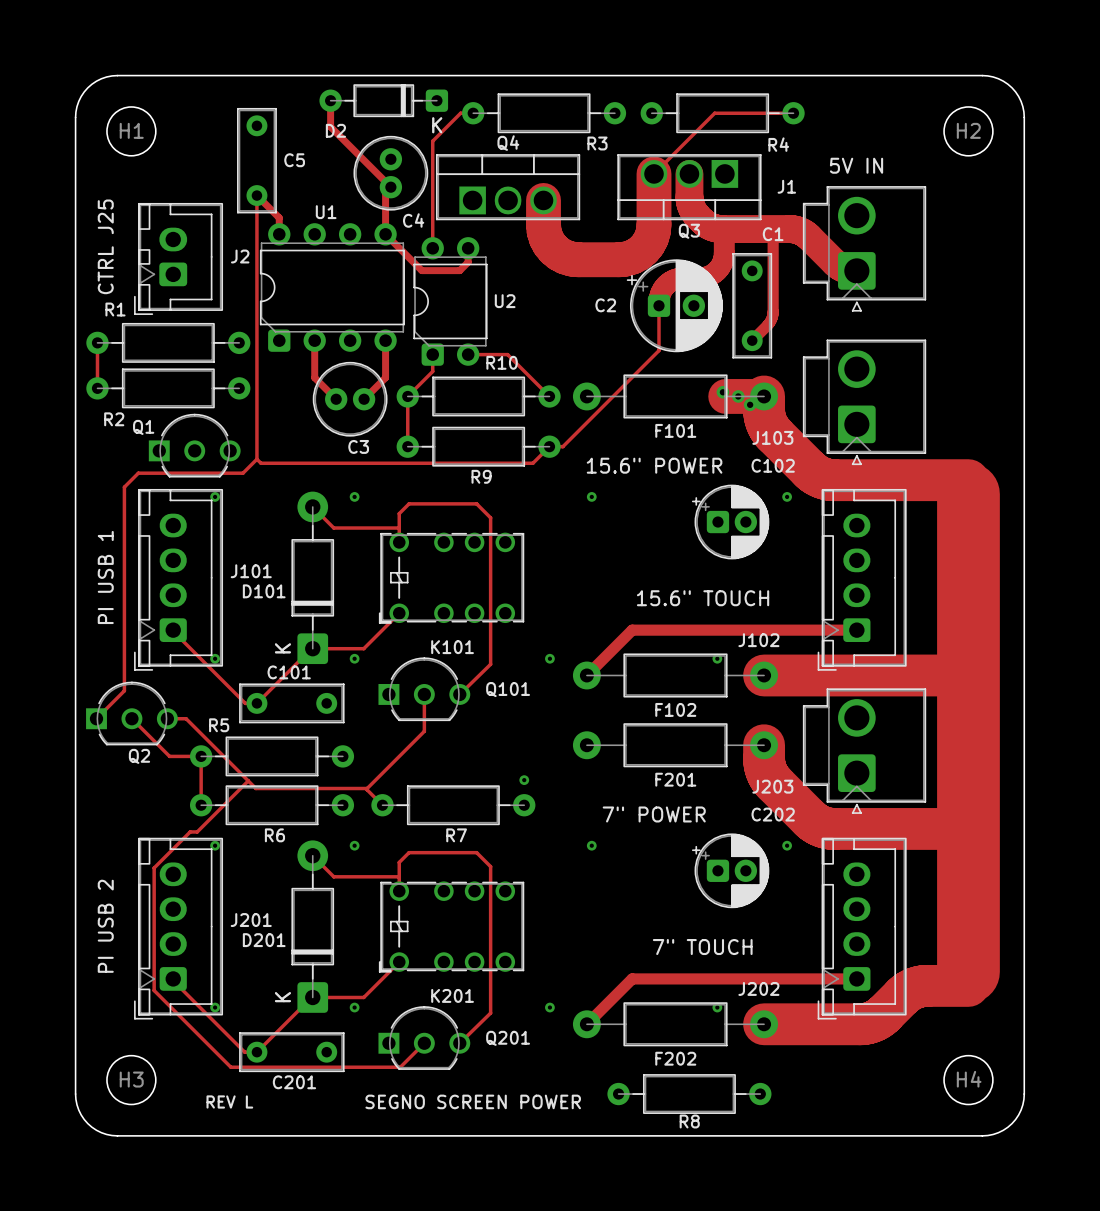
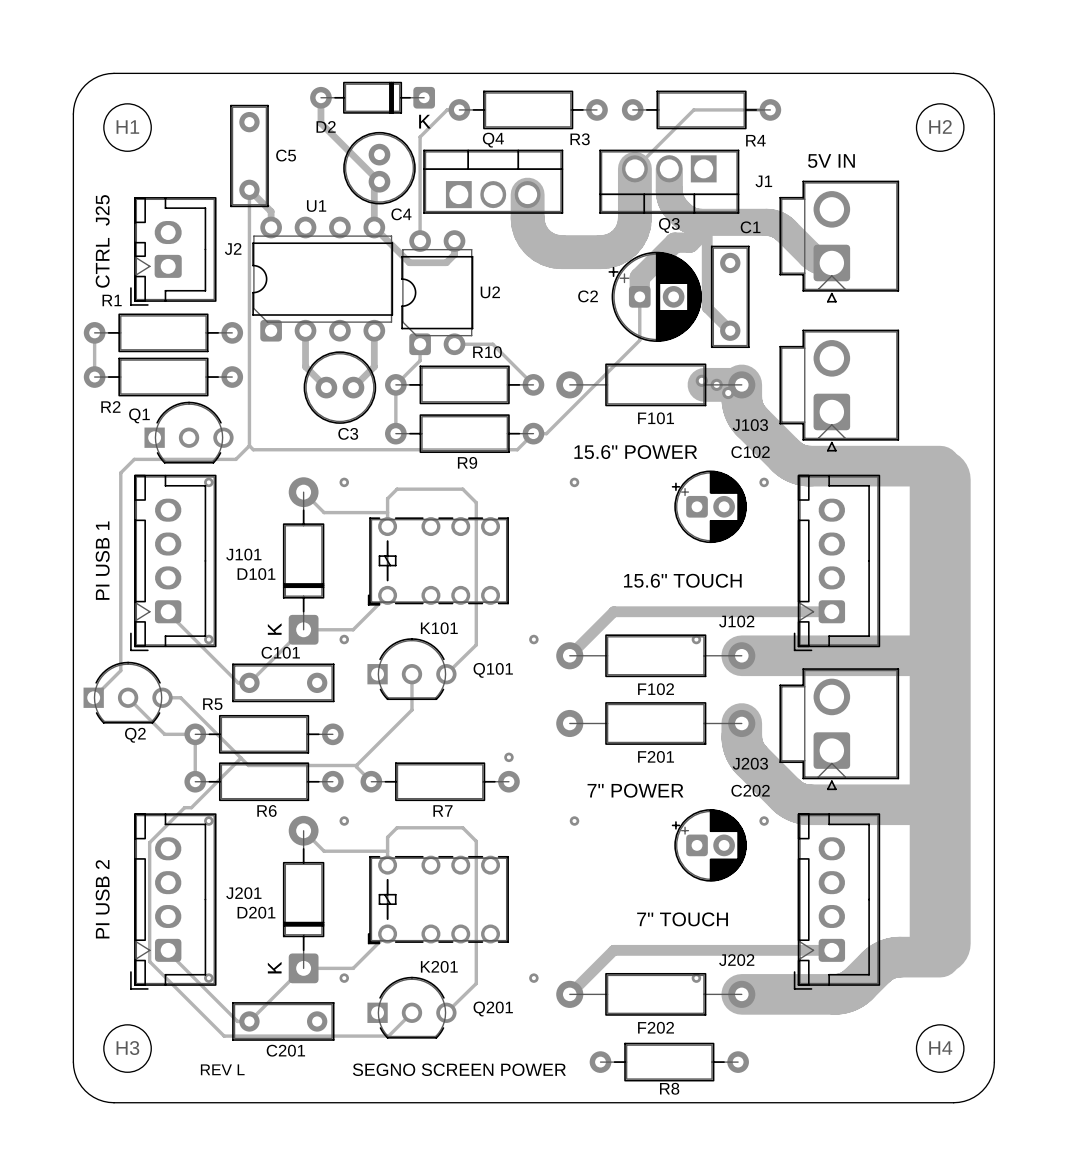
track: (724, 229) (723, 258) (717, 270) (704, 277) (678, 278) (669, 281) (663, 288) (658, 302) -> (730, 330) (707, 307) (707, 225) (709, 222) (689, 242) (674, 242) (639, 277) (639, 293)
track: (773, 229) (772, 315) (768, 324) (752, 340) -> none

